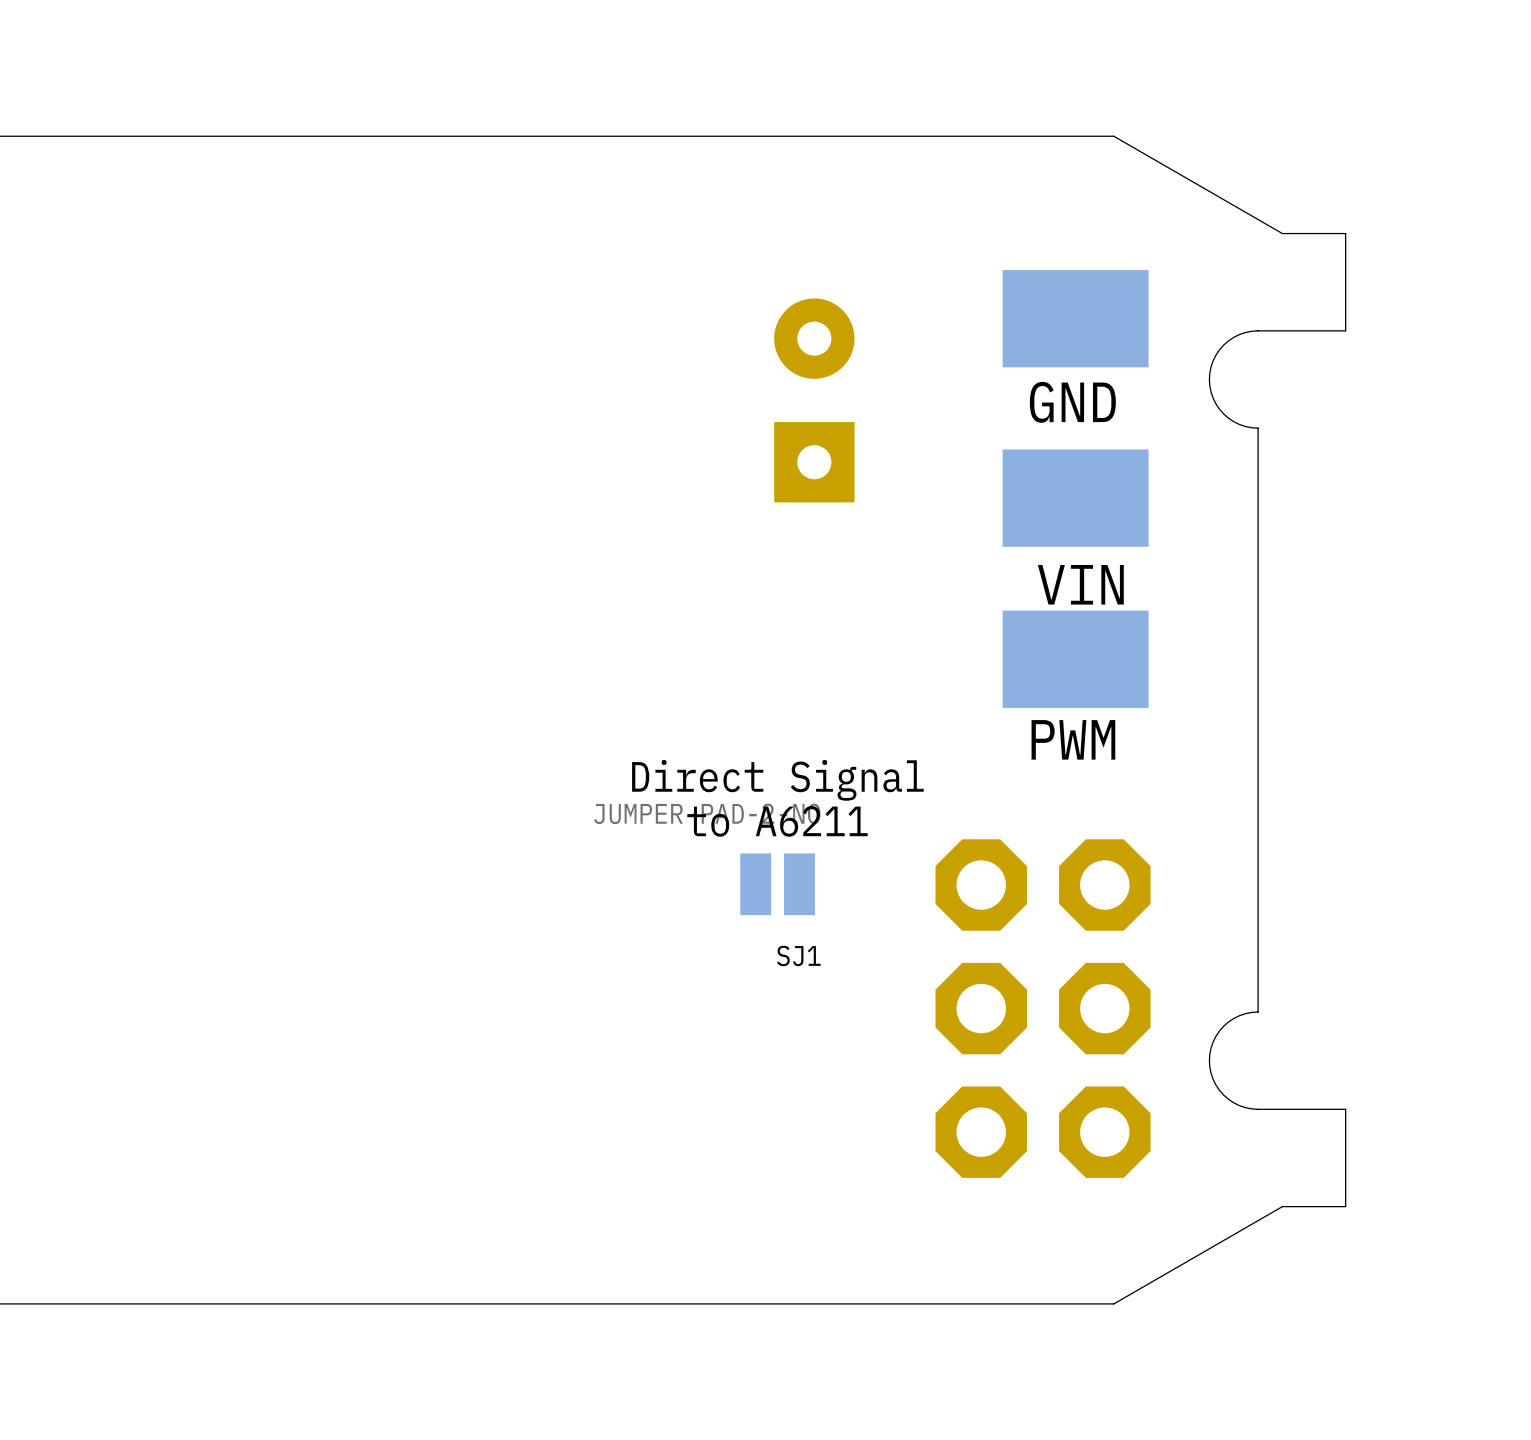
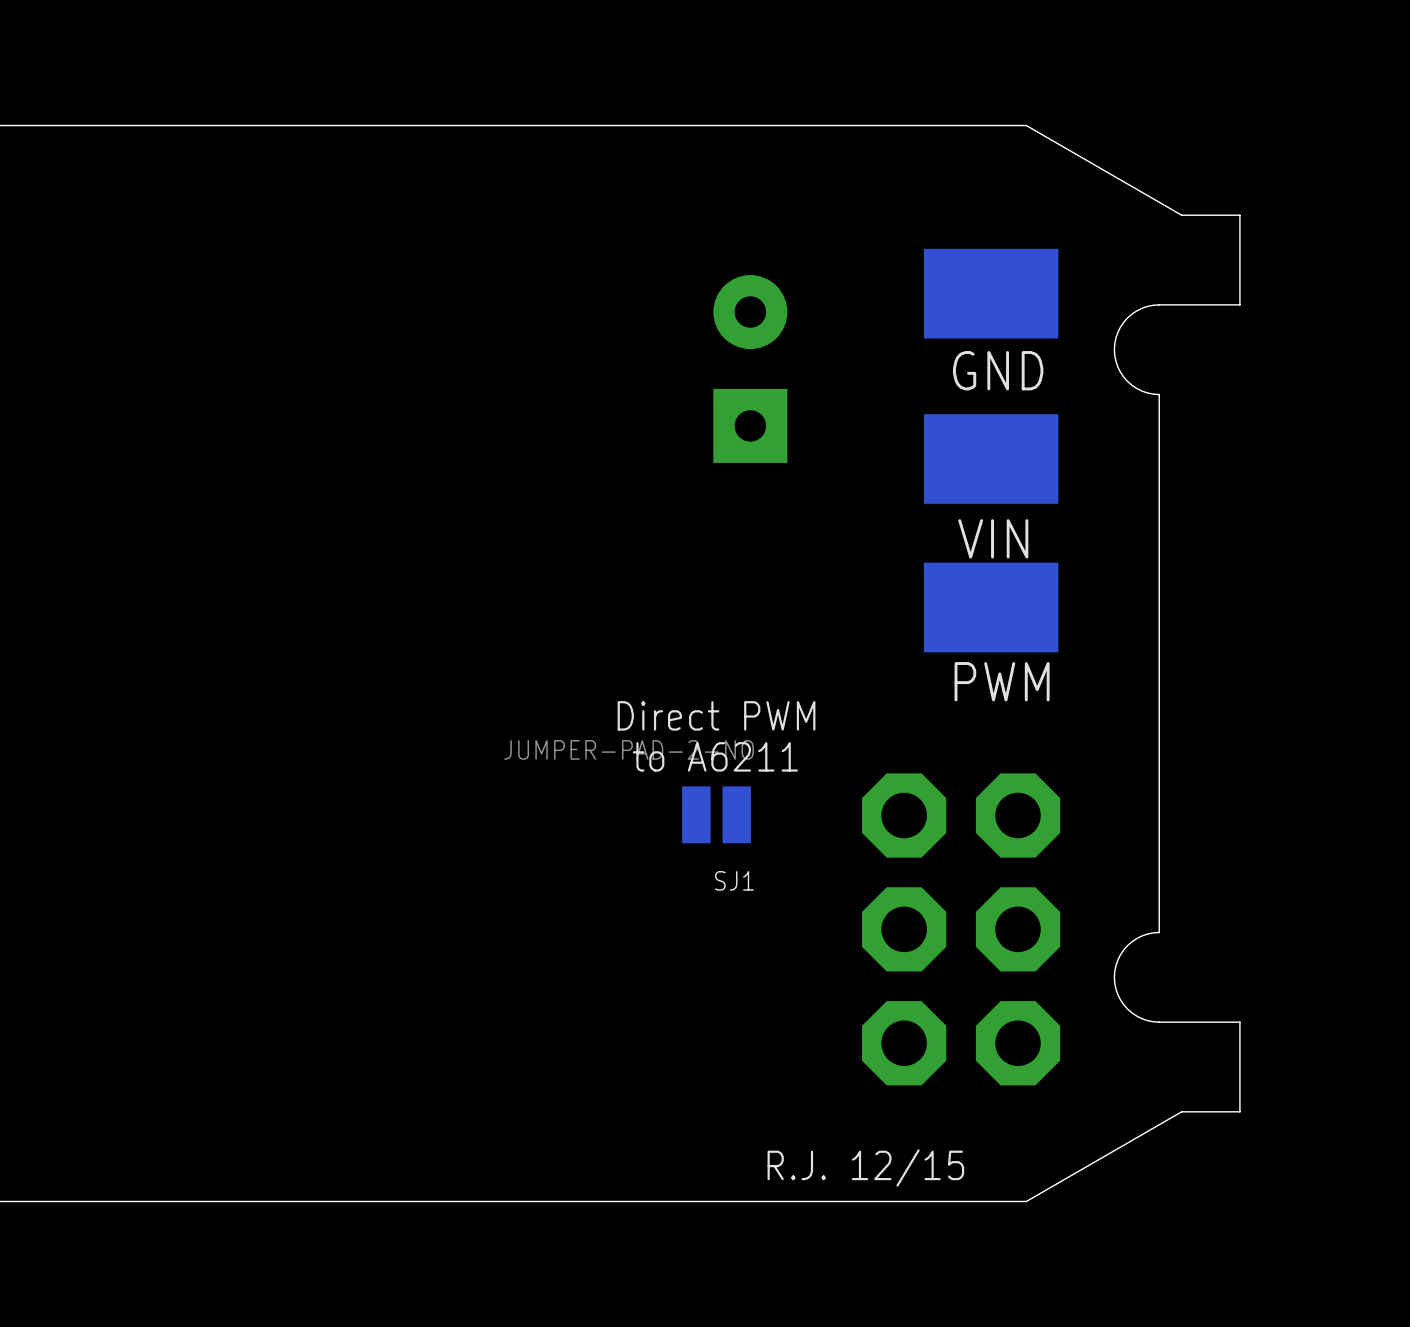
text: Direct Signal (777, 780) -> Direct PWM (716, 715)
text: none -> R.J. 12/15 (865, 1168)

